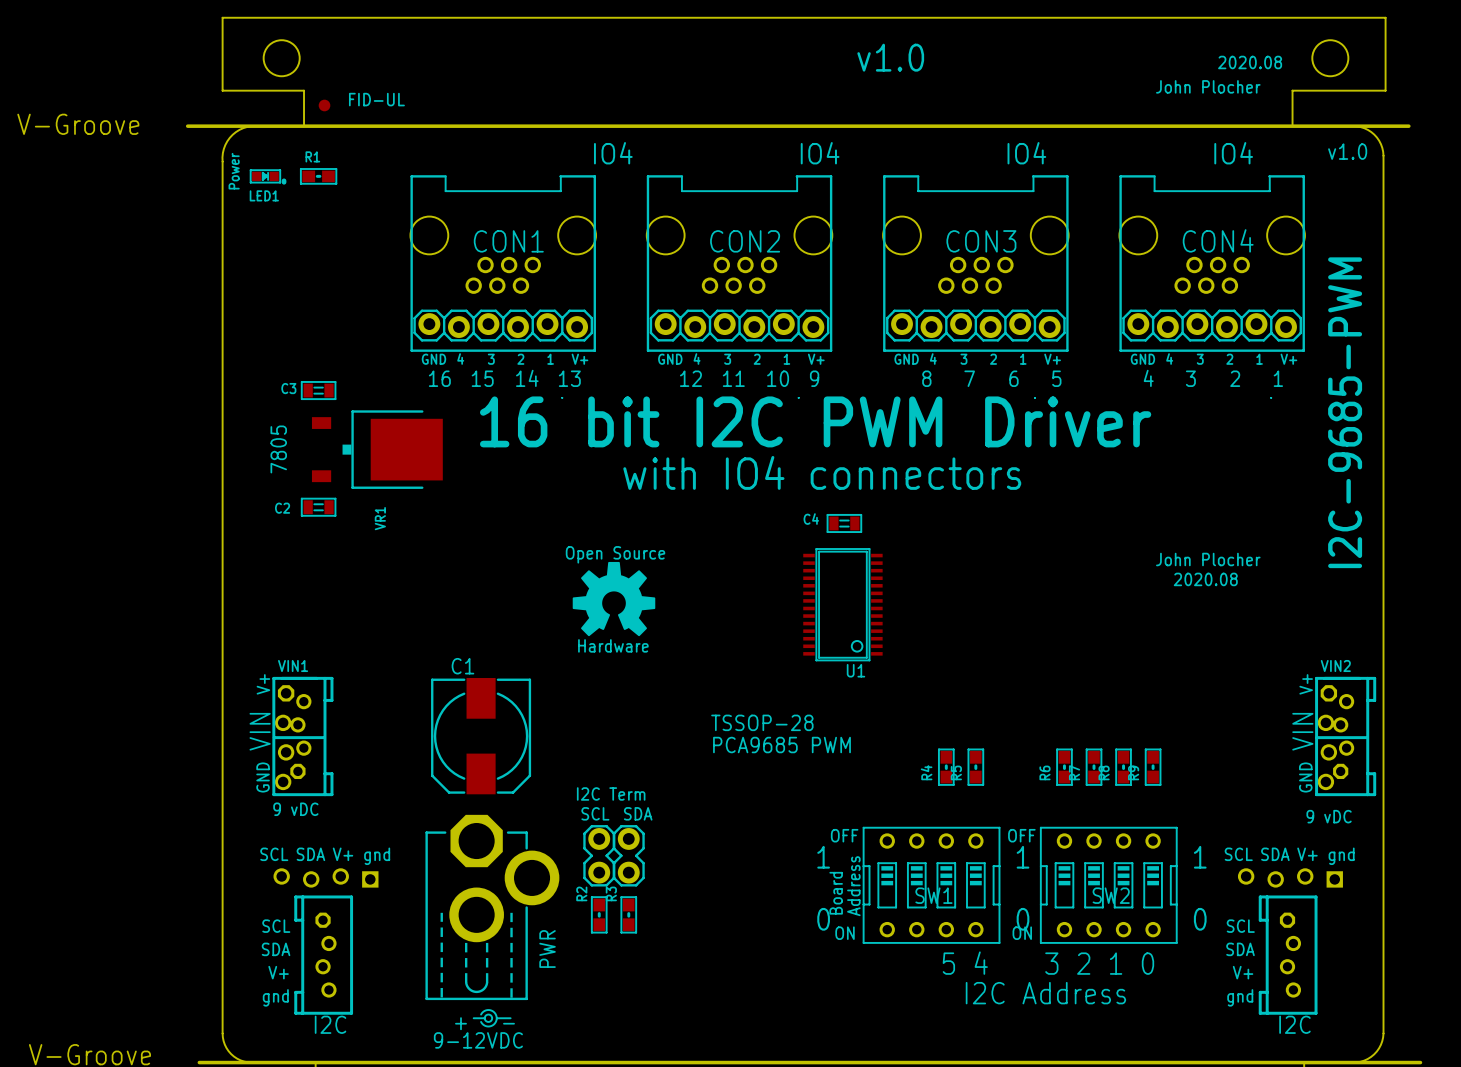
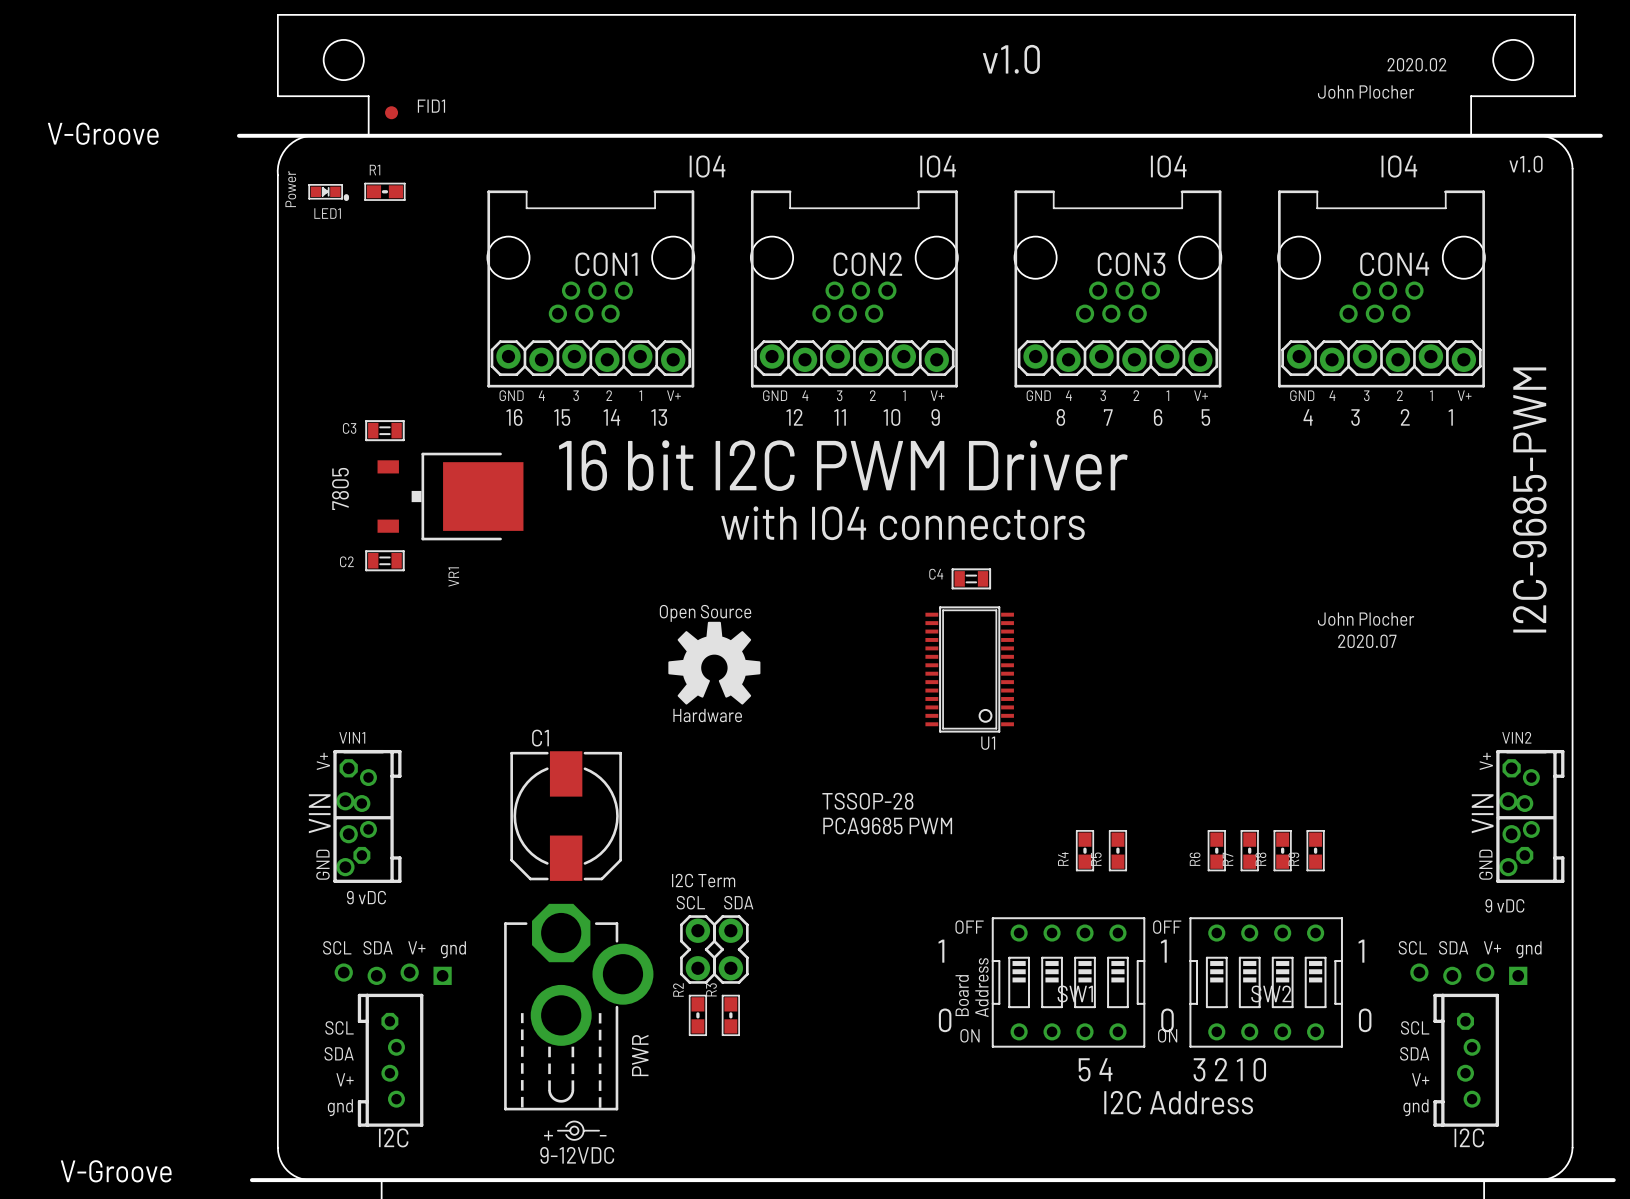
text: 2020.08 (1250, 62) -> 2020.02 (1416, 64)
FID-UL name: FID-UL (376, 99) -> FID1 (431, 106)
text: 2020.08 (1205, 579) -> 2020.07 (1367, 641)

